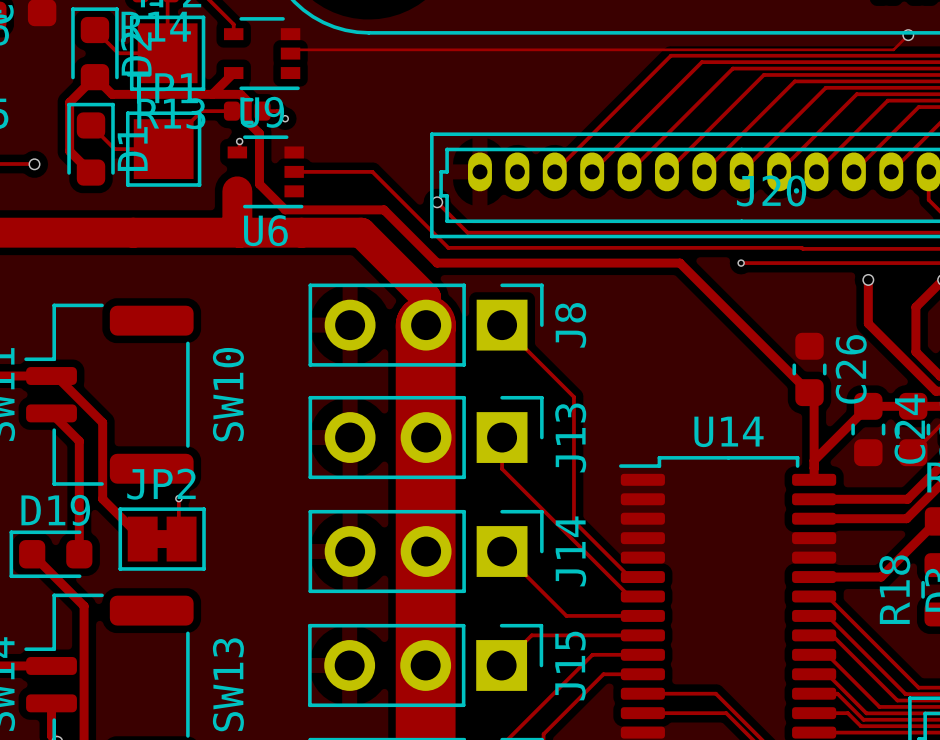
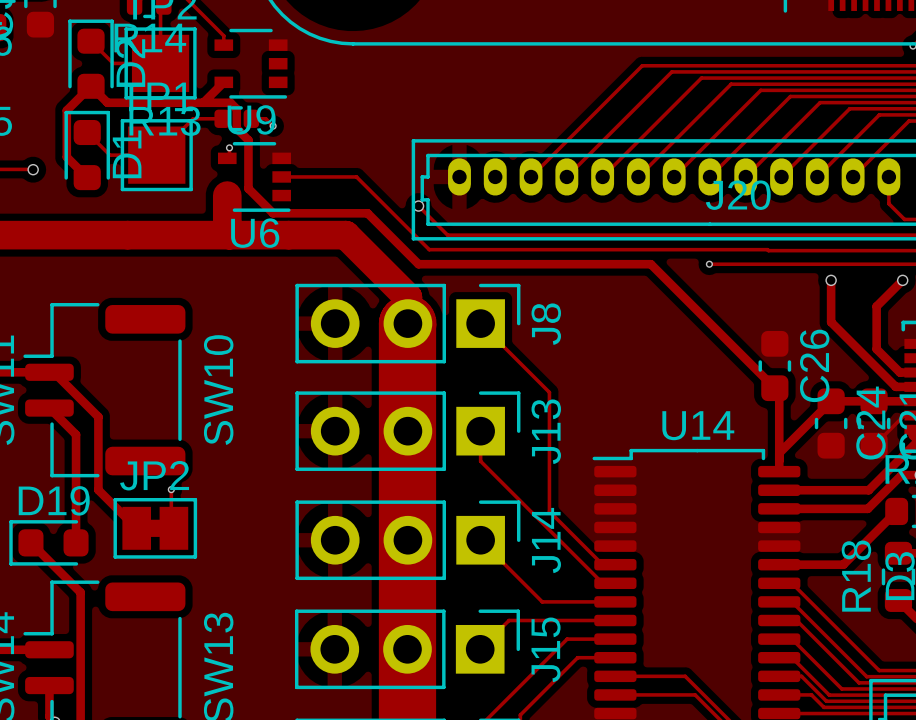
track: (908, 35) (893, 49) (294, 49) (290, 53) -> none
via: (908, 35) -> none

